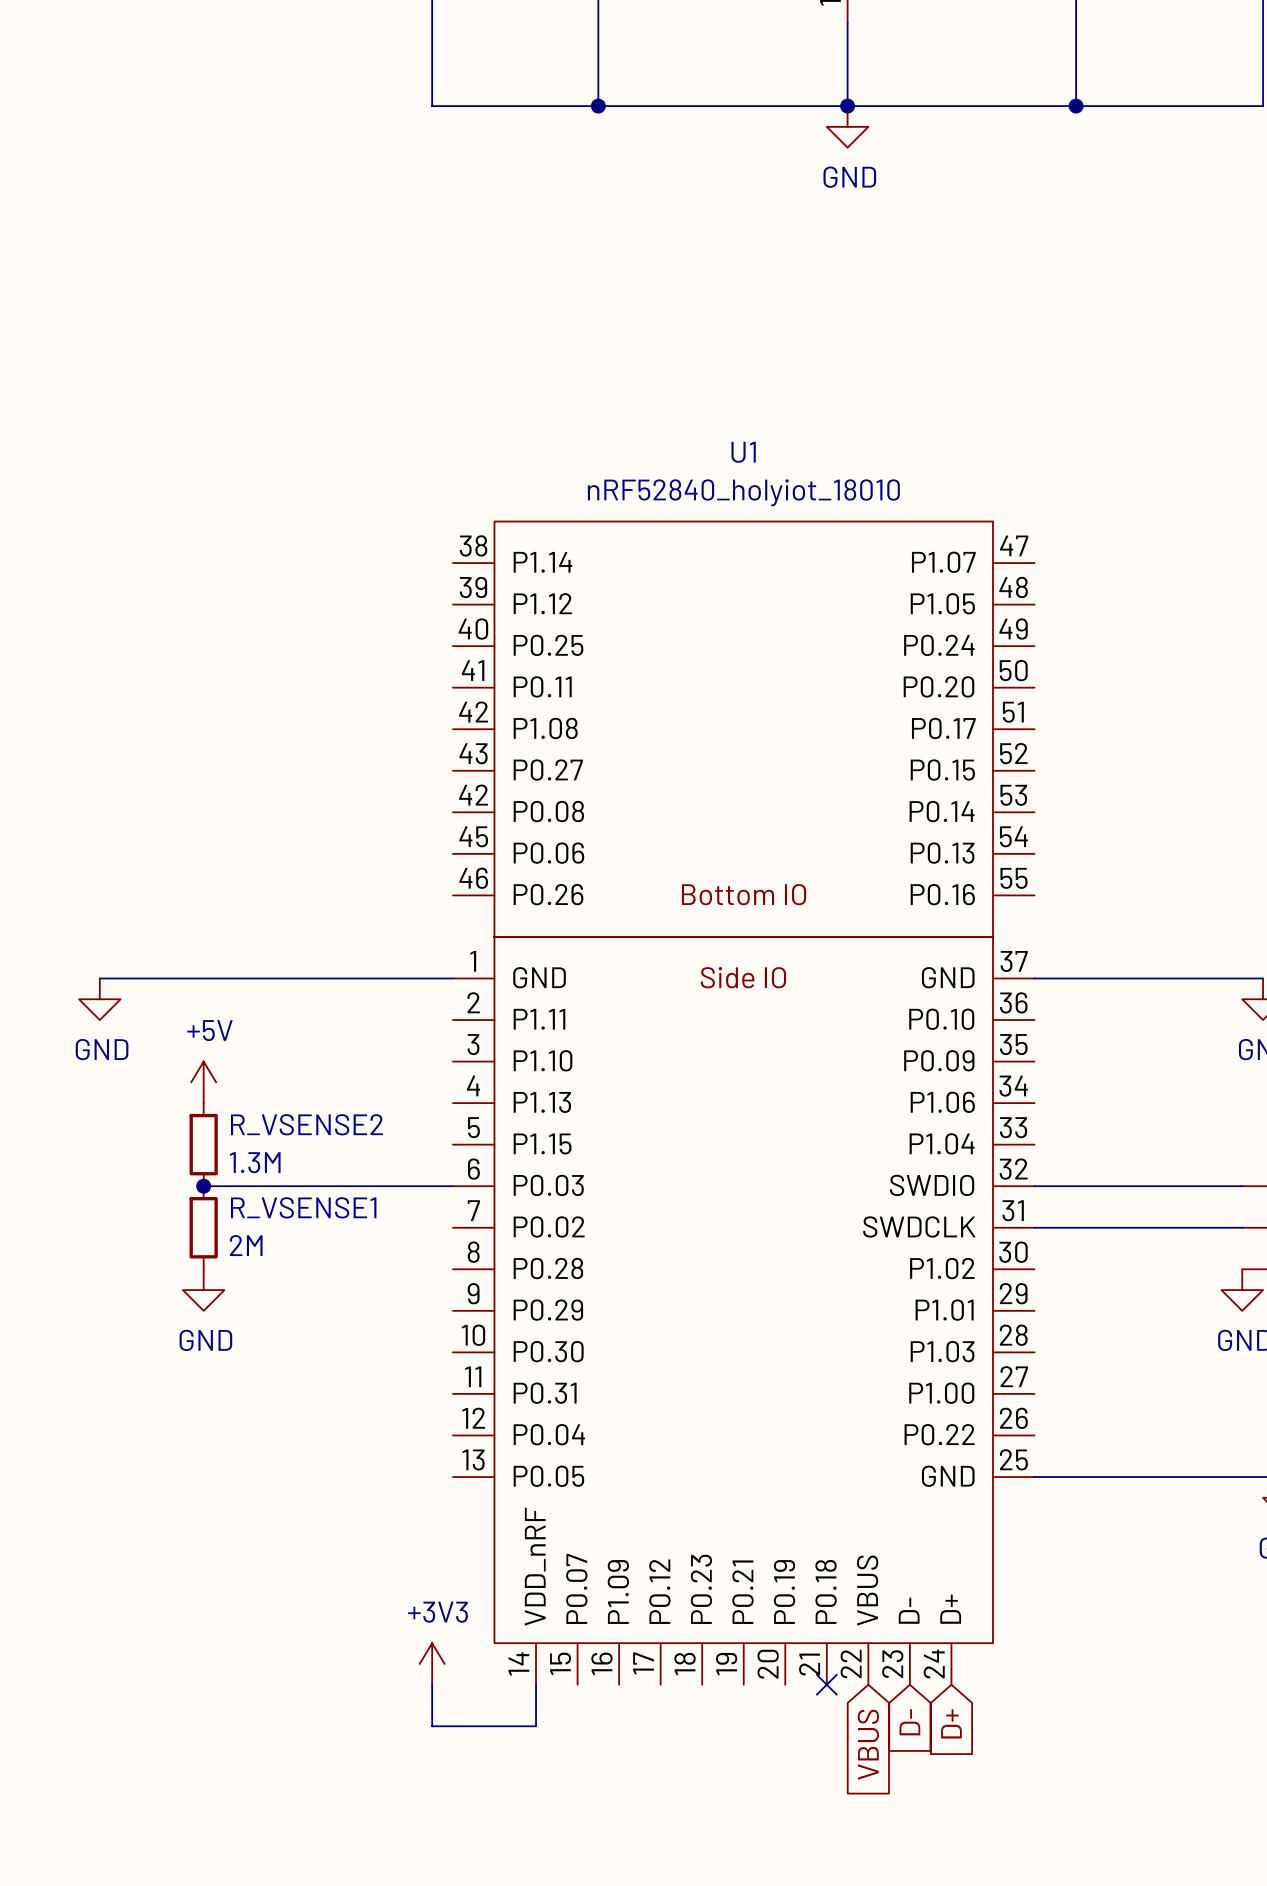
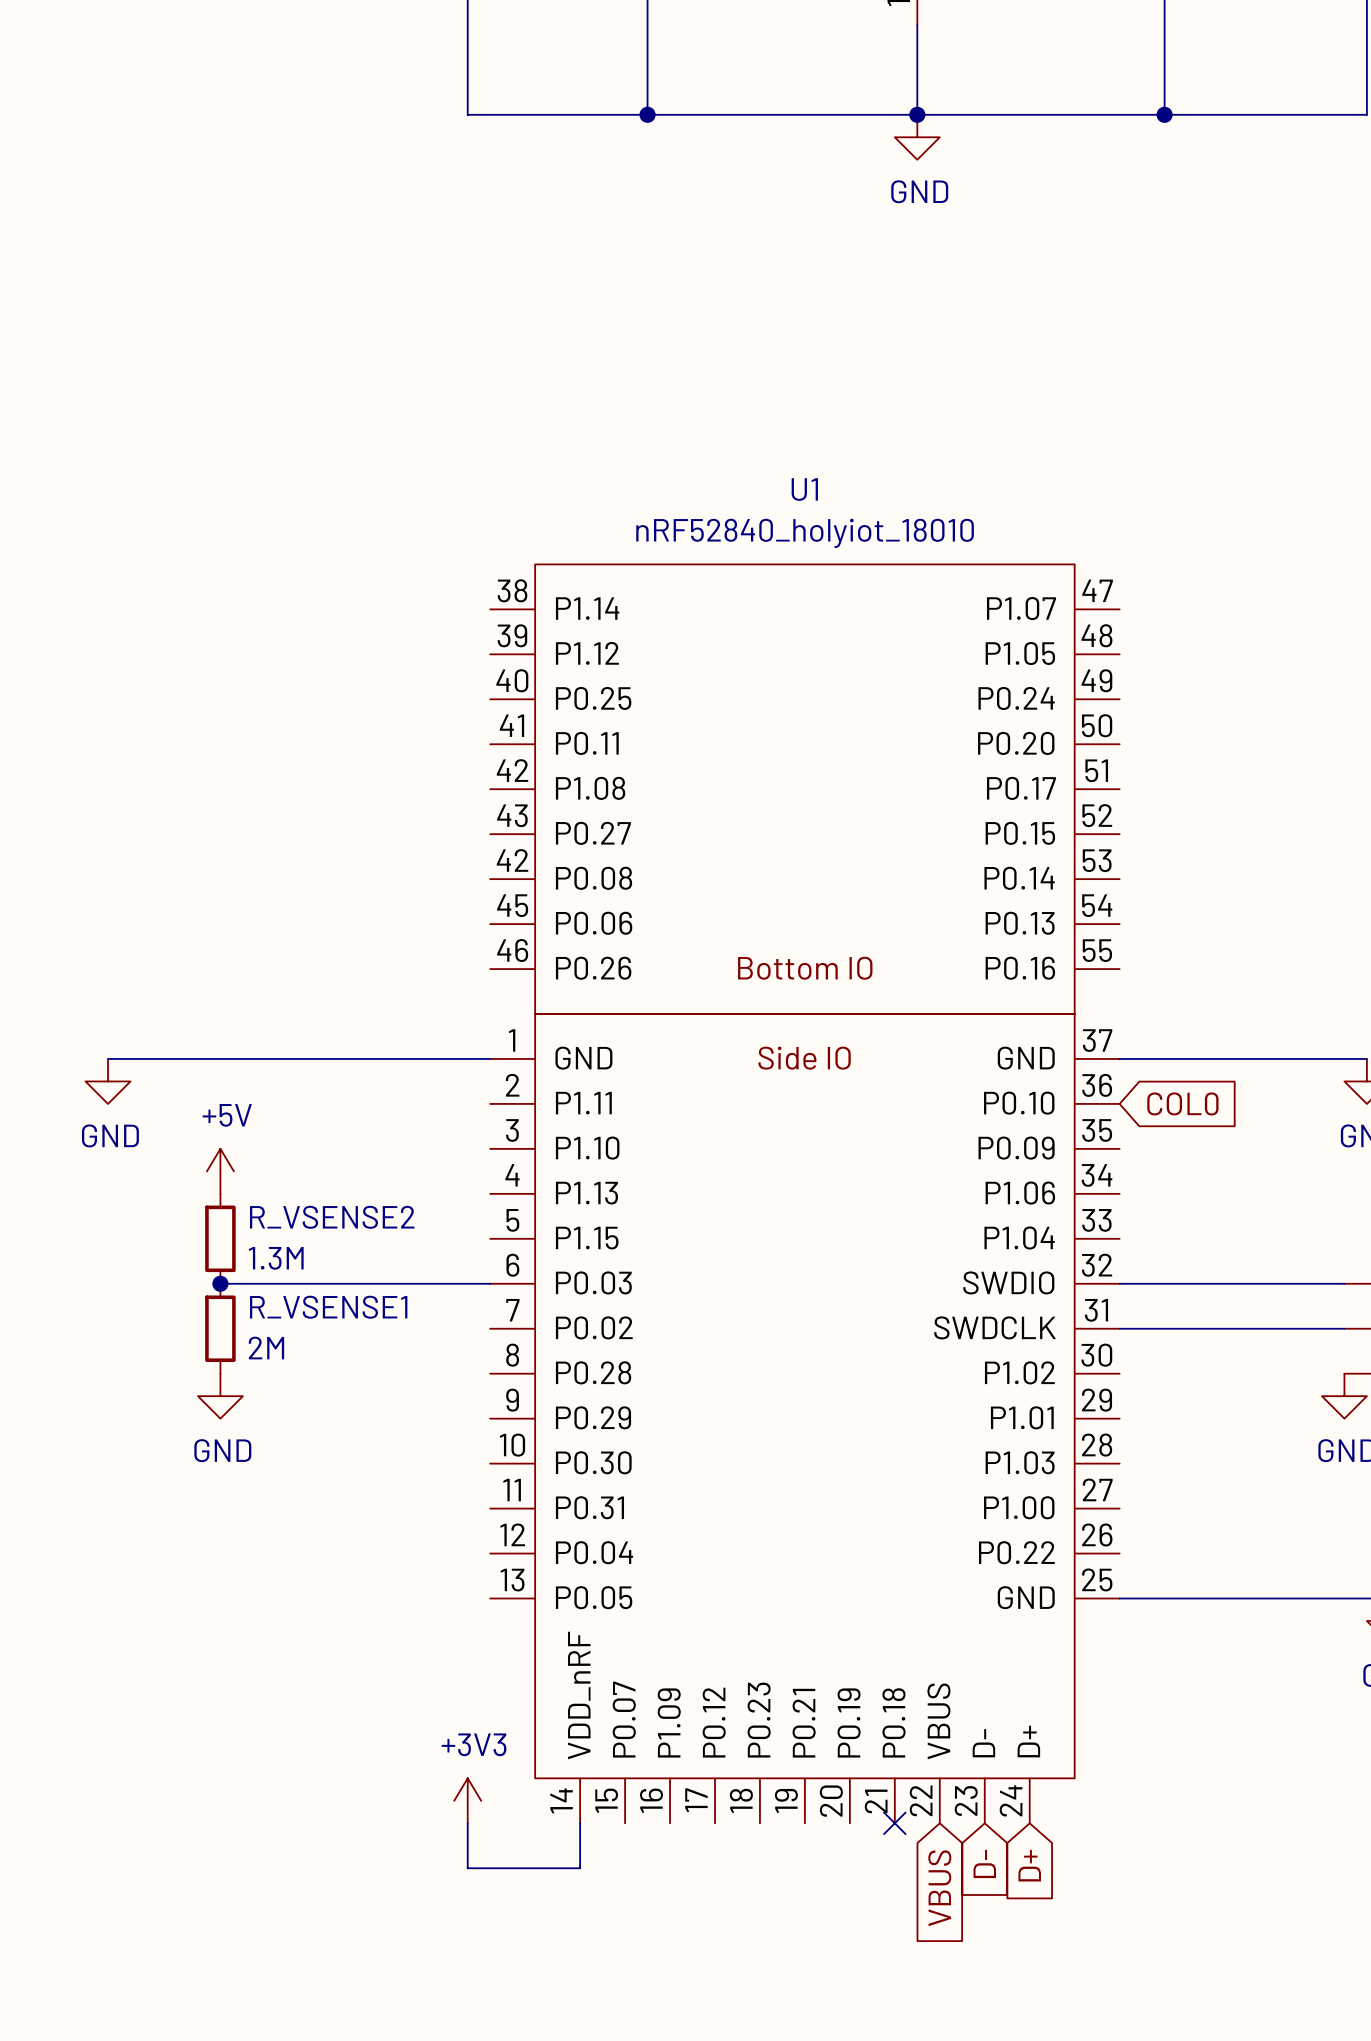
global label: none -> COL0 (1182, 1103)

